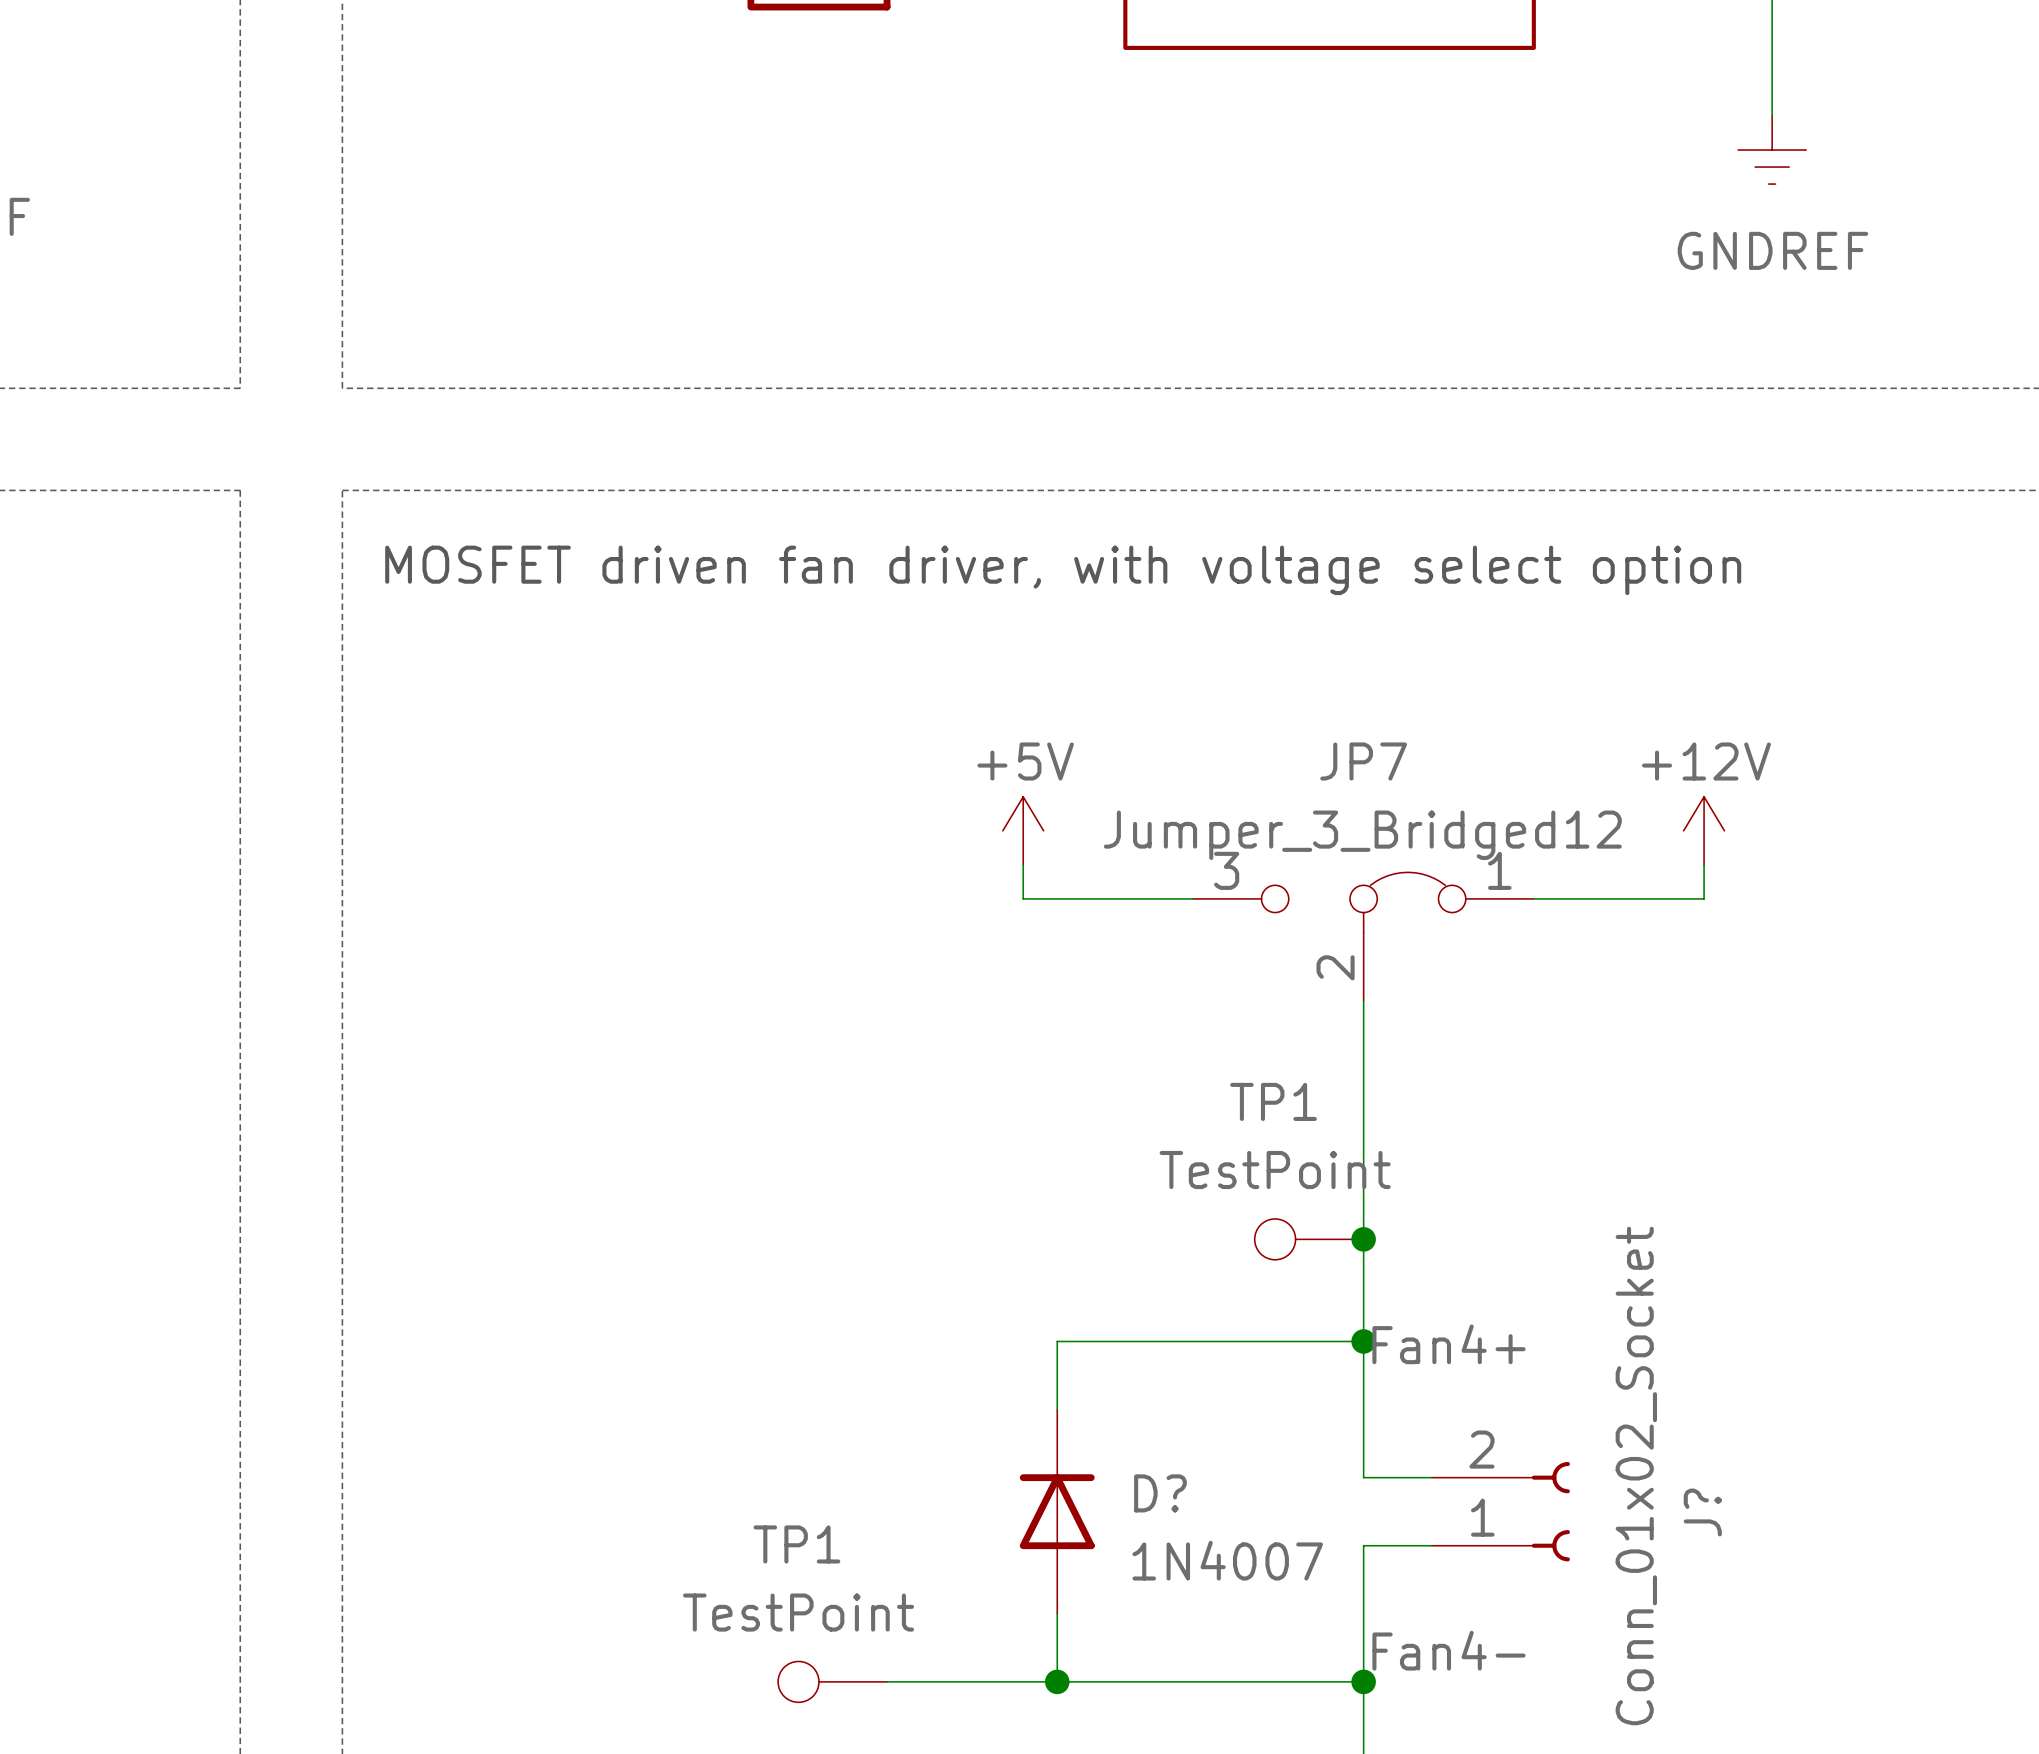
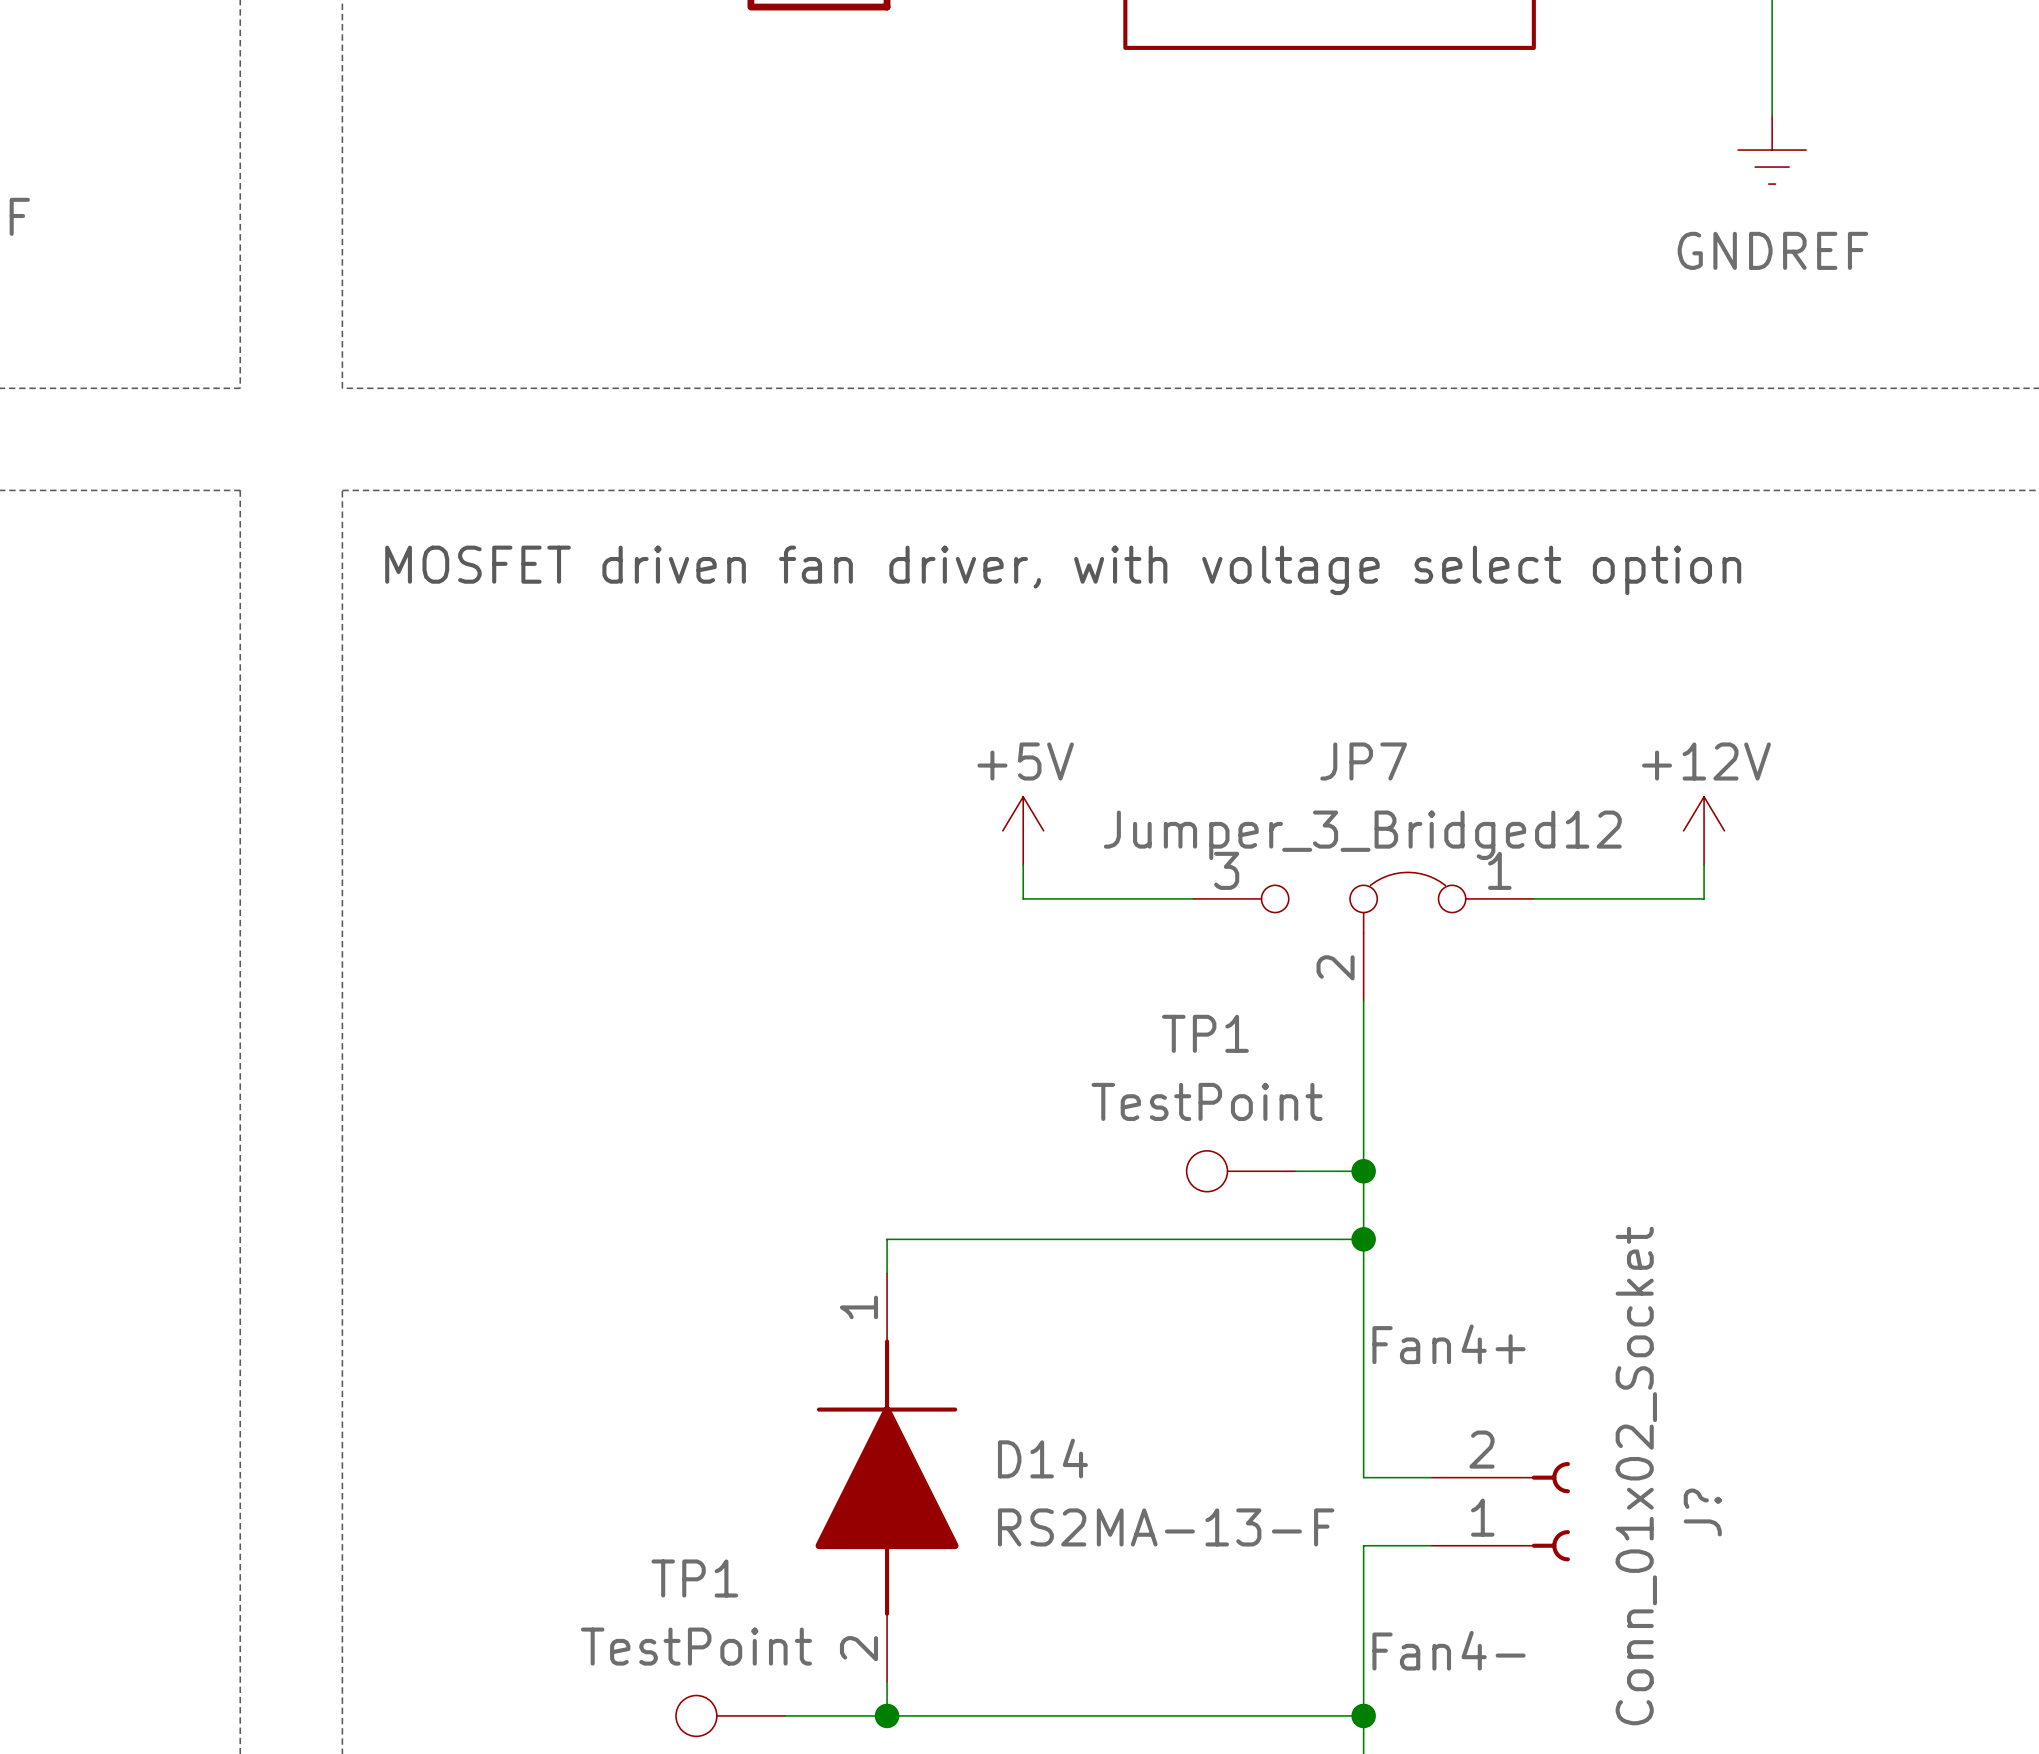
wire: none -> (1295, 1171) (1363, 1171)
junction: none -> (1363, 1171)
TP1 position: (1309, 1239) -> (1241, 1171)
wire: none -> (1363, 1239) (887, 1239) (887, 1273)
wire: (1363, 1341) (1057, 1341) (1057, 1409) -> none
junction: (1363, 1341) -> none
D14: none -> RS2MA-13-F (887, 1477)
D?: 1N4007 (1057, 1511) -> none
wire: (1057, 1613) (1057, 1681) -> none
TP1 position: (832, 1681) -> (730, 1715)
wire: (887, 1681) (1363, 1681) -> (887, 1681) (887, 1715)
junction: (1057, 1681) -> none
junction position: (1363, 1681) -> (1363, 1715)
wire: none -> (784, 1715) (1363, 1715)
junction: none -> (887, 1715)

